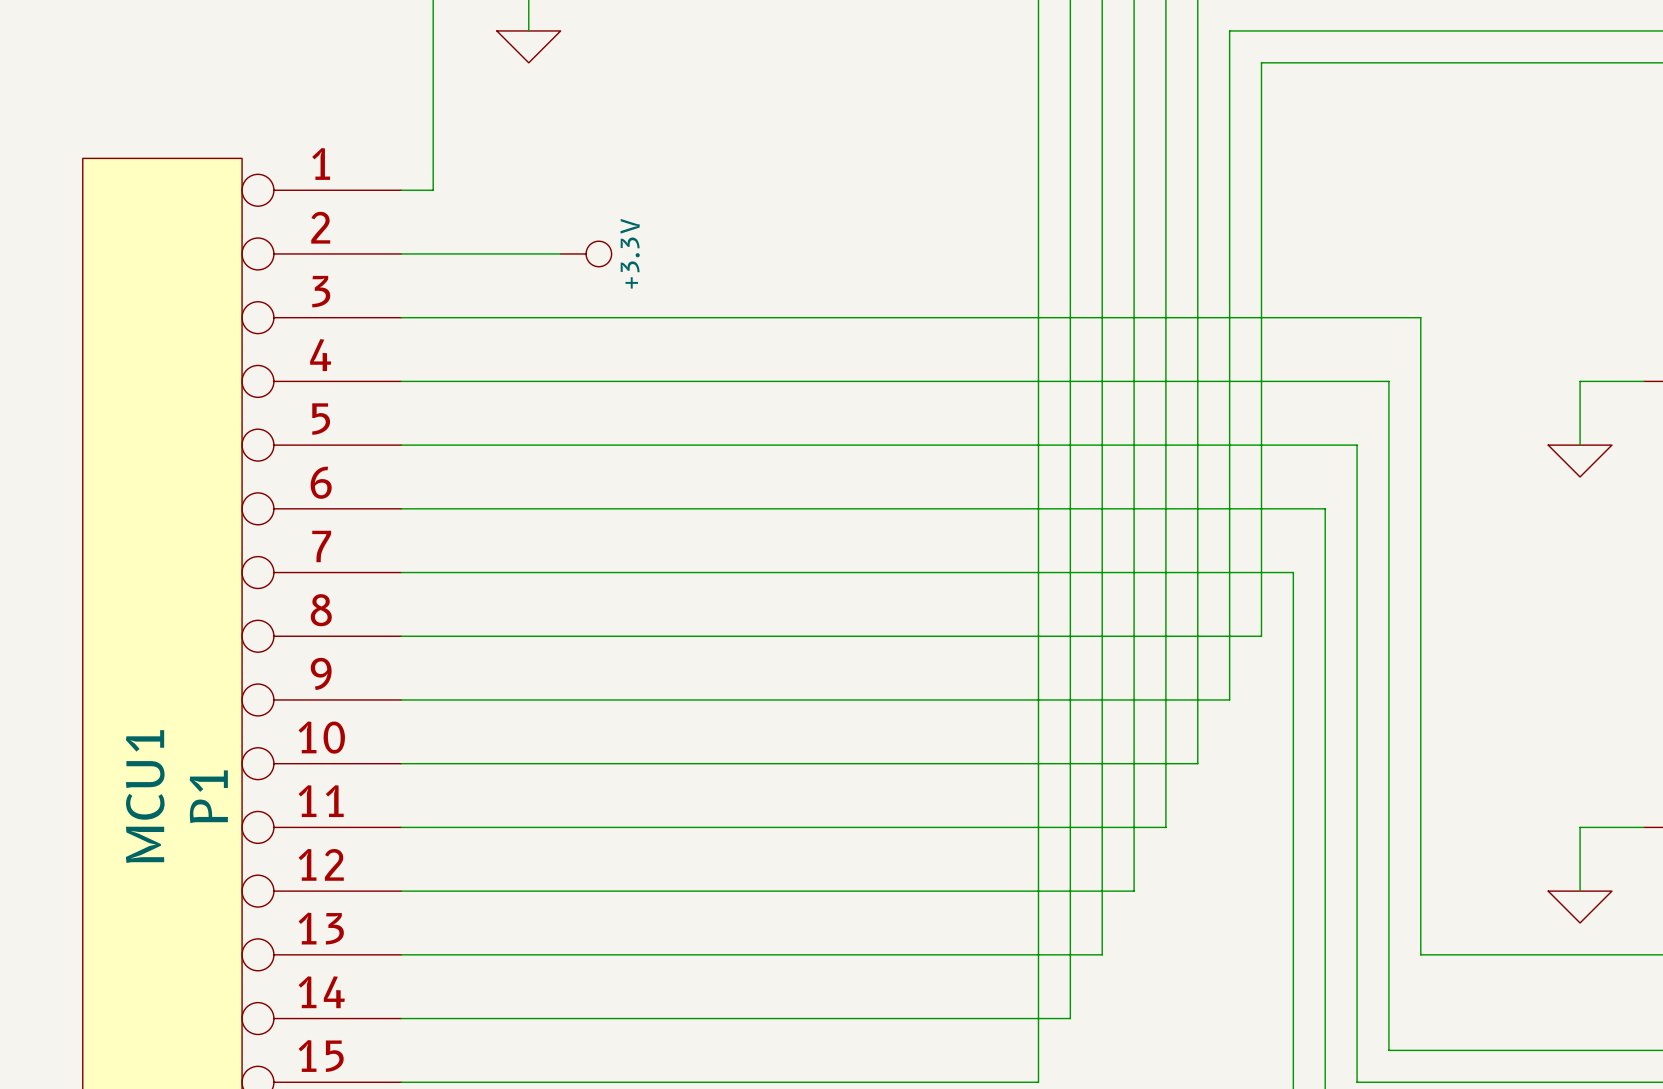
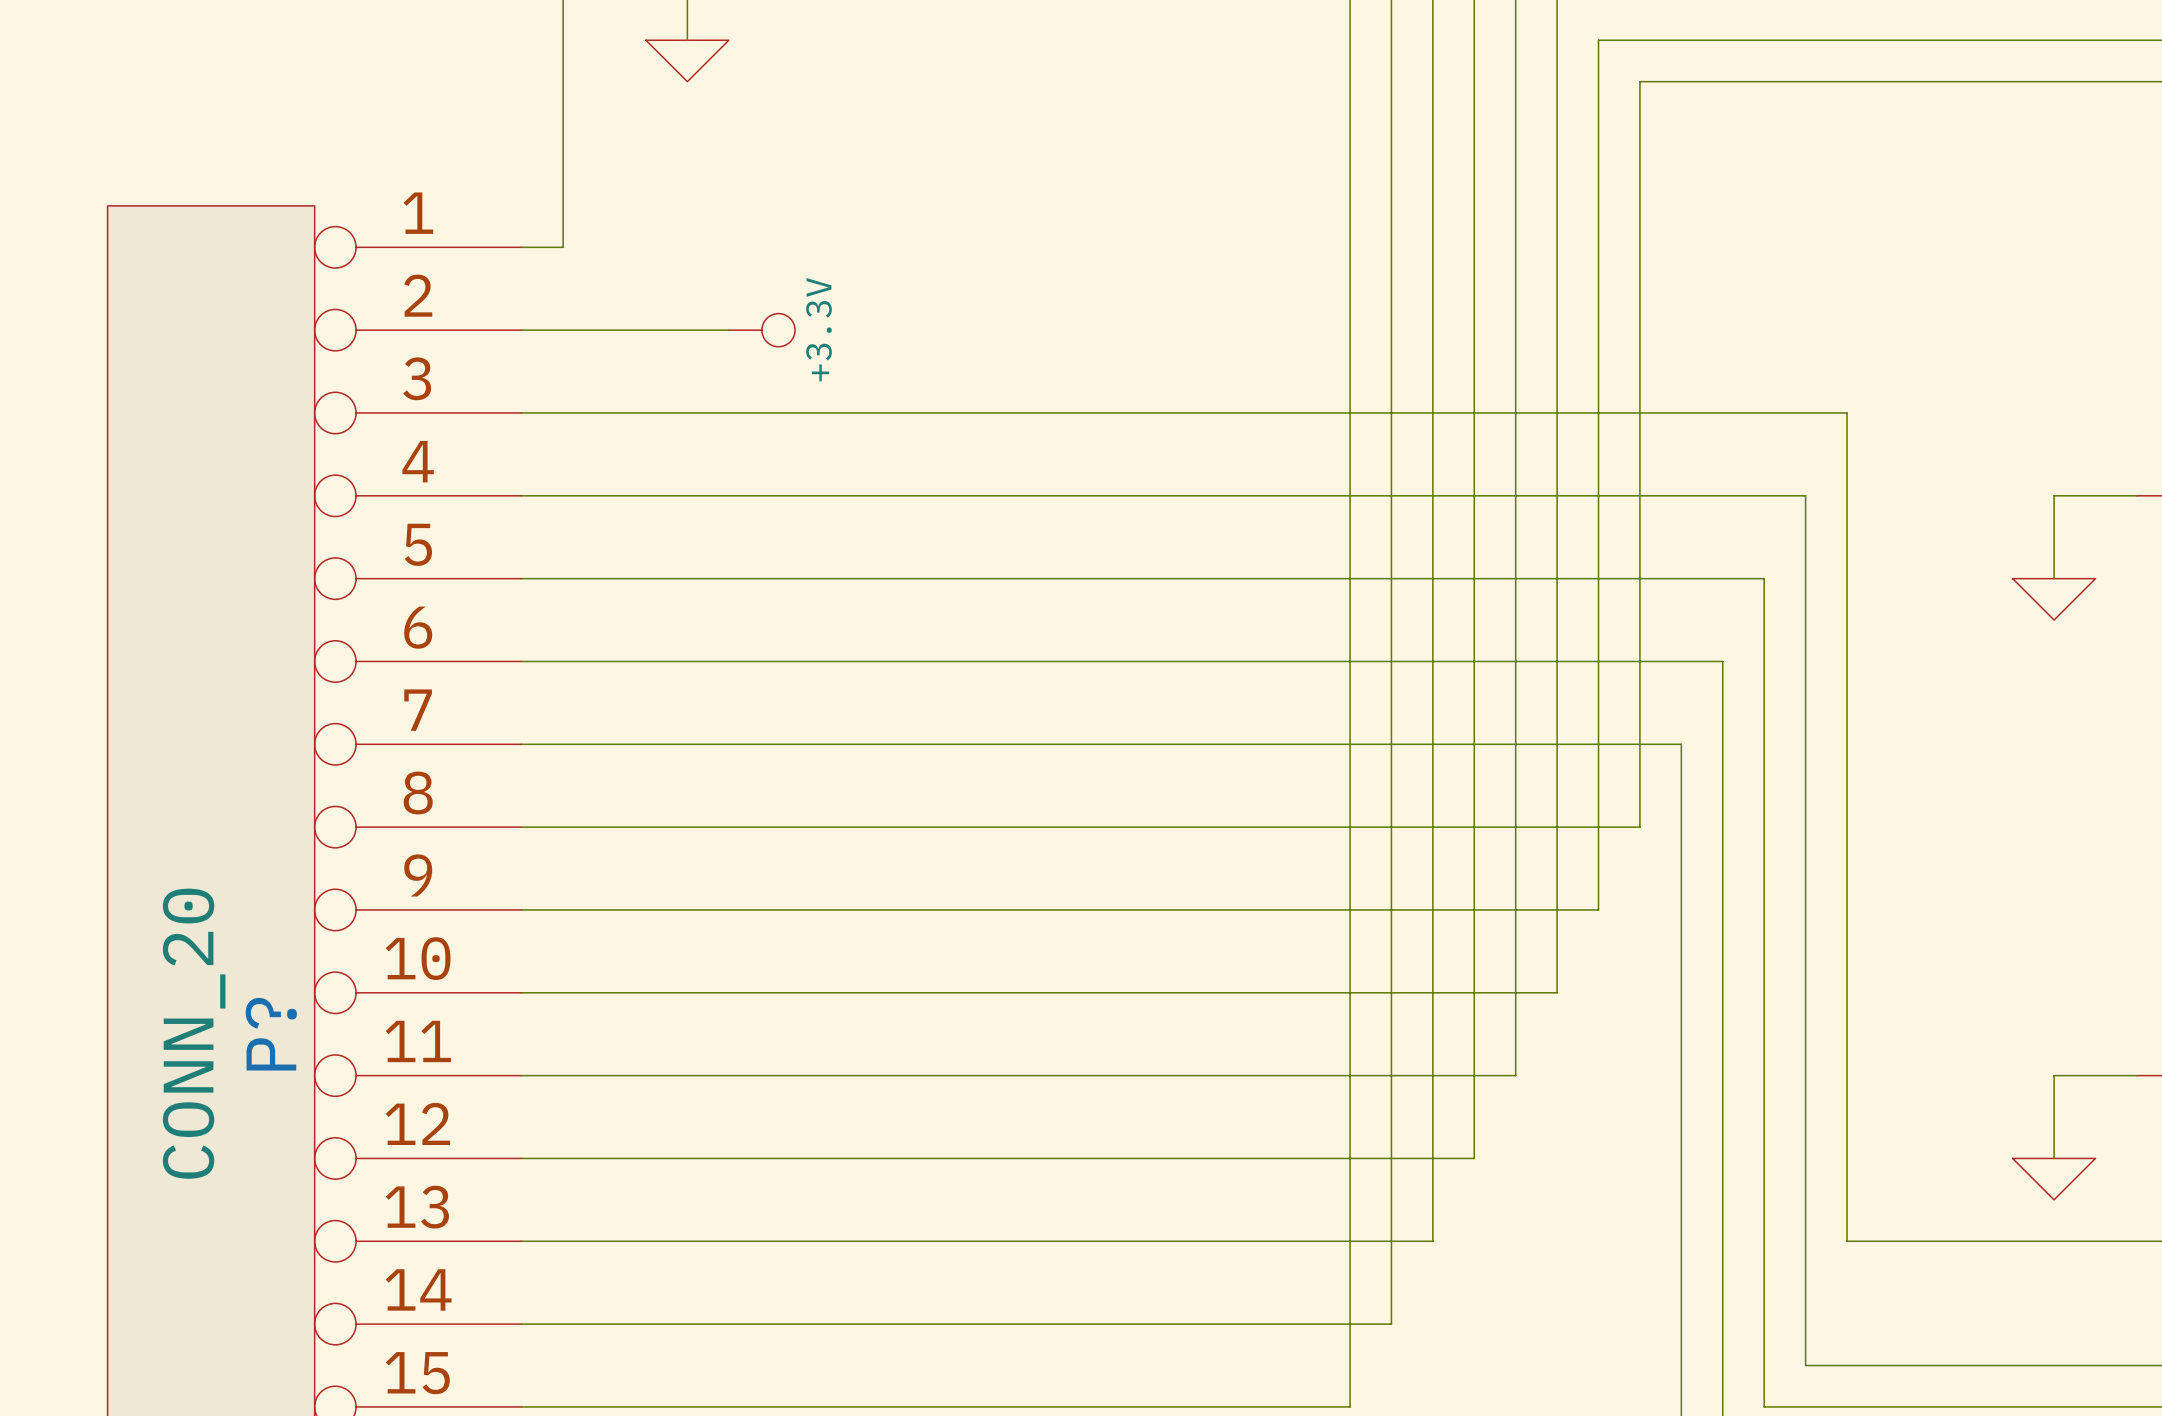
P1 value: MCU1 (145, 796) -> CONN_20 (194, 1033)
P1 name: P1 (208, 796) -> P? (271, 1034)

